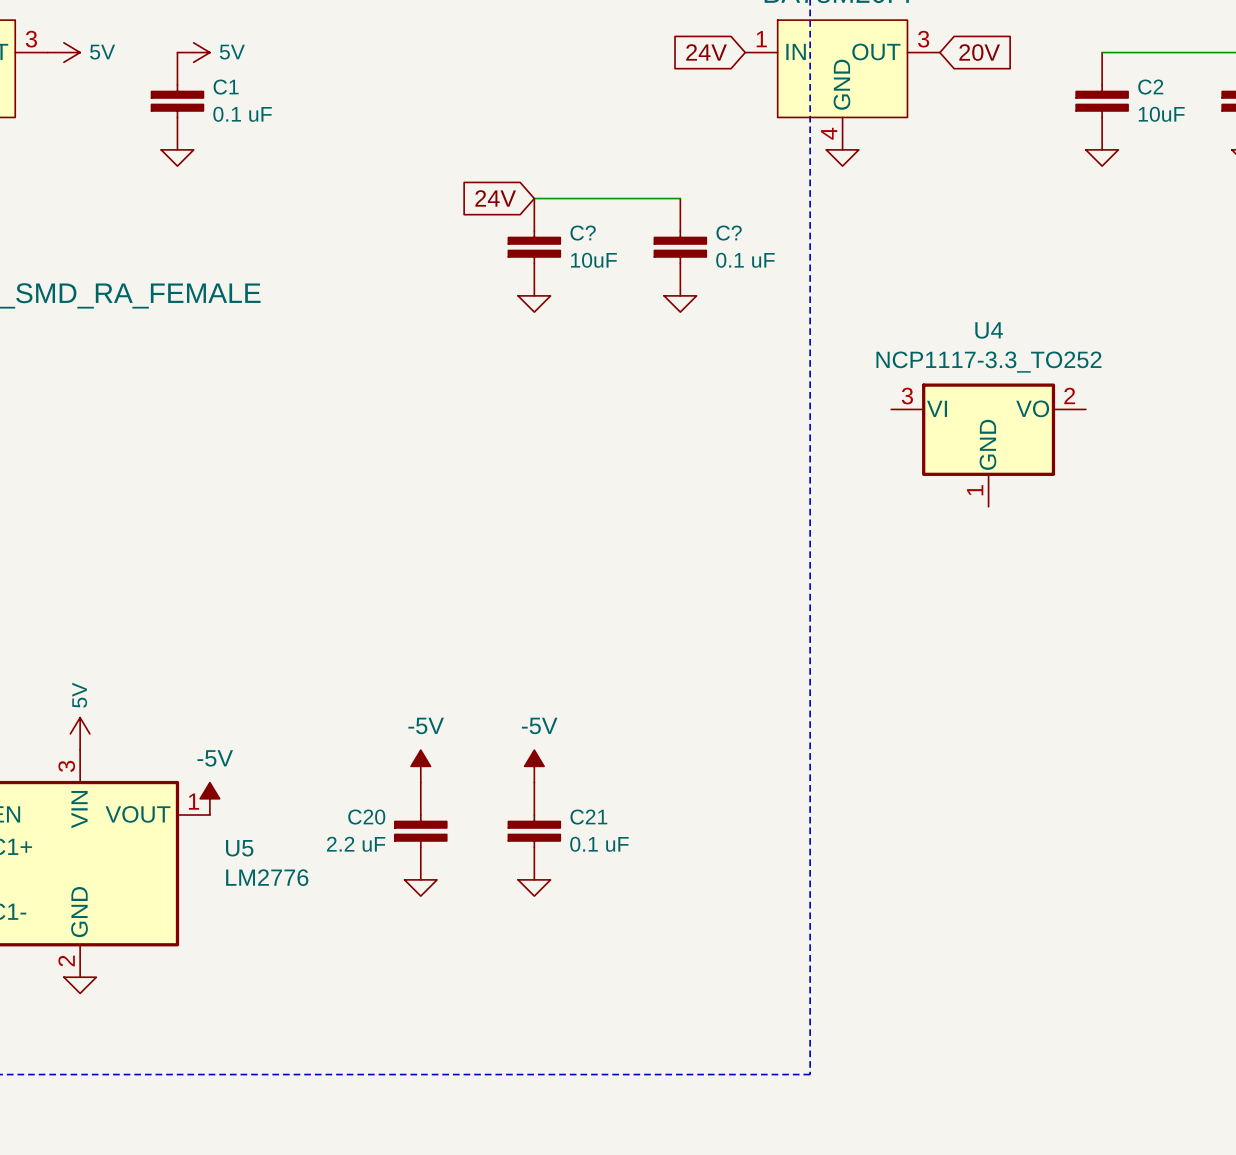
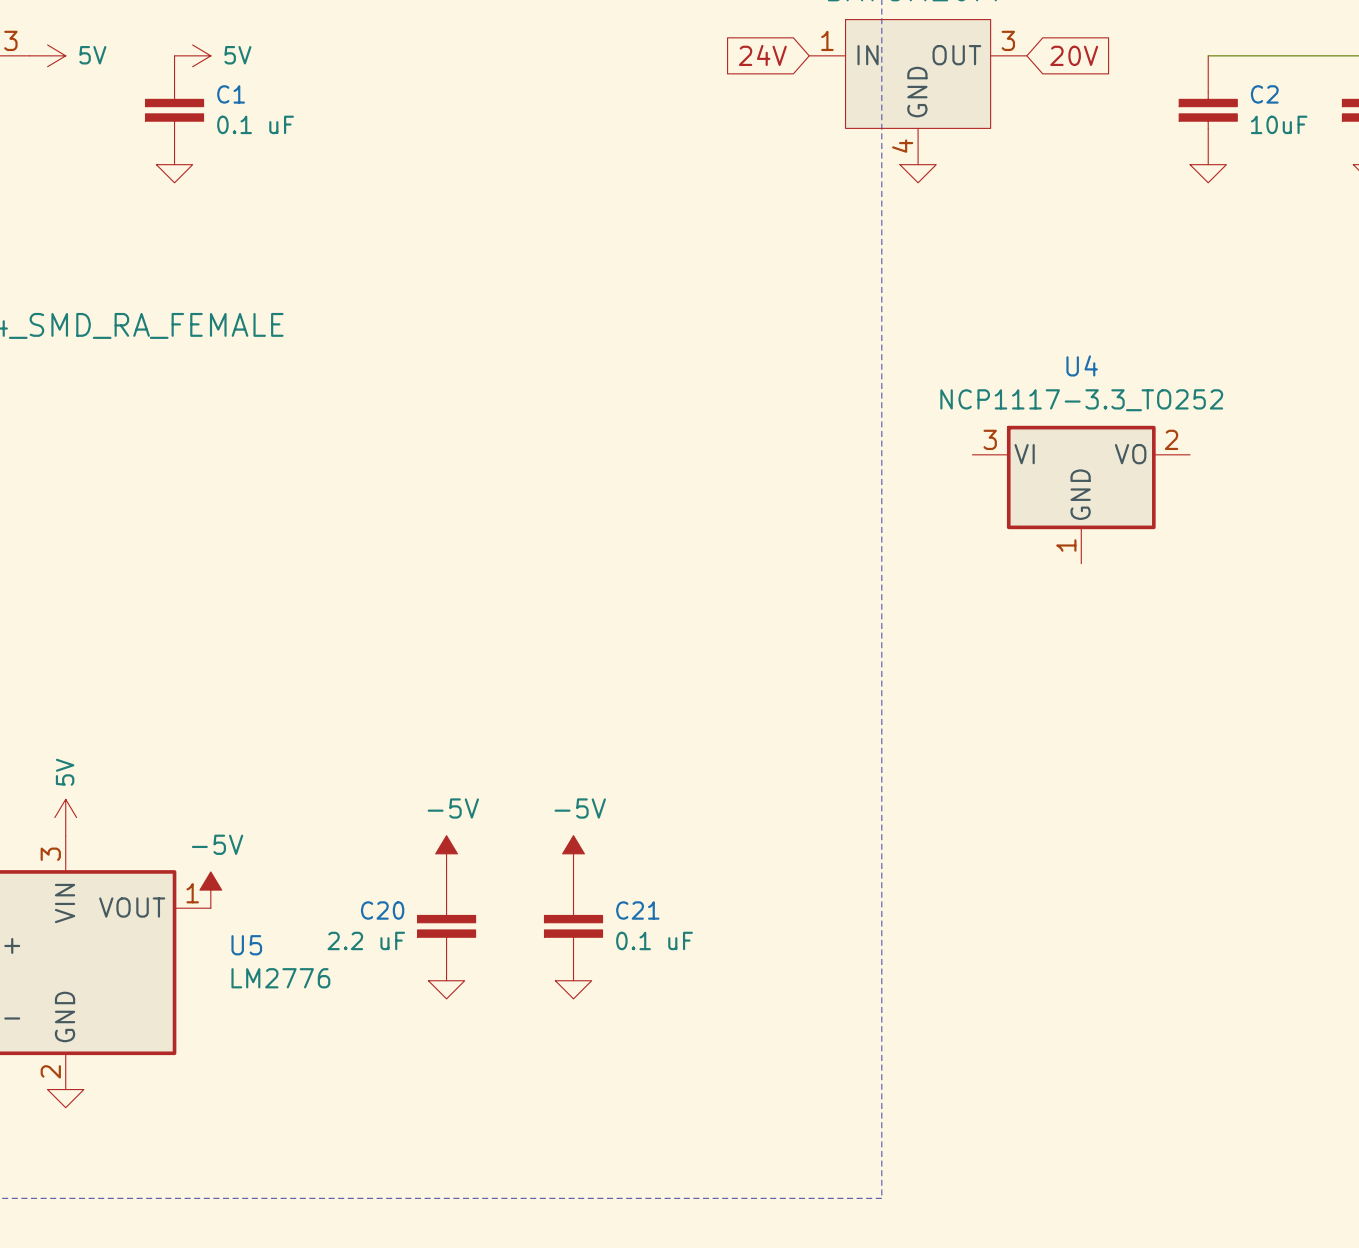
global label: 24V (495, 198) -> none
wire: (534, 198) (680, 198) -> none
C?: 10uF (534, 247) -> none
C?: 0.1 uF (680, 247) -> none
power symbol: (534, 304) -> none
power symbol: (680, 304) -> none

